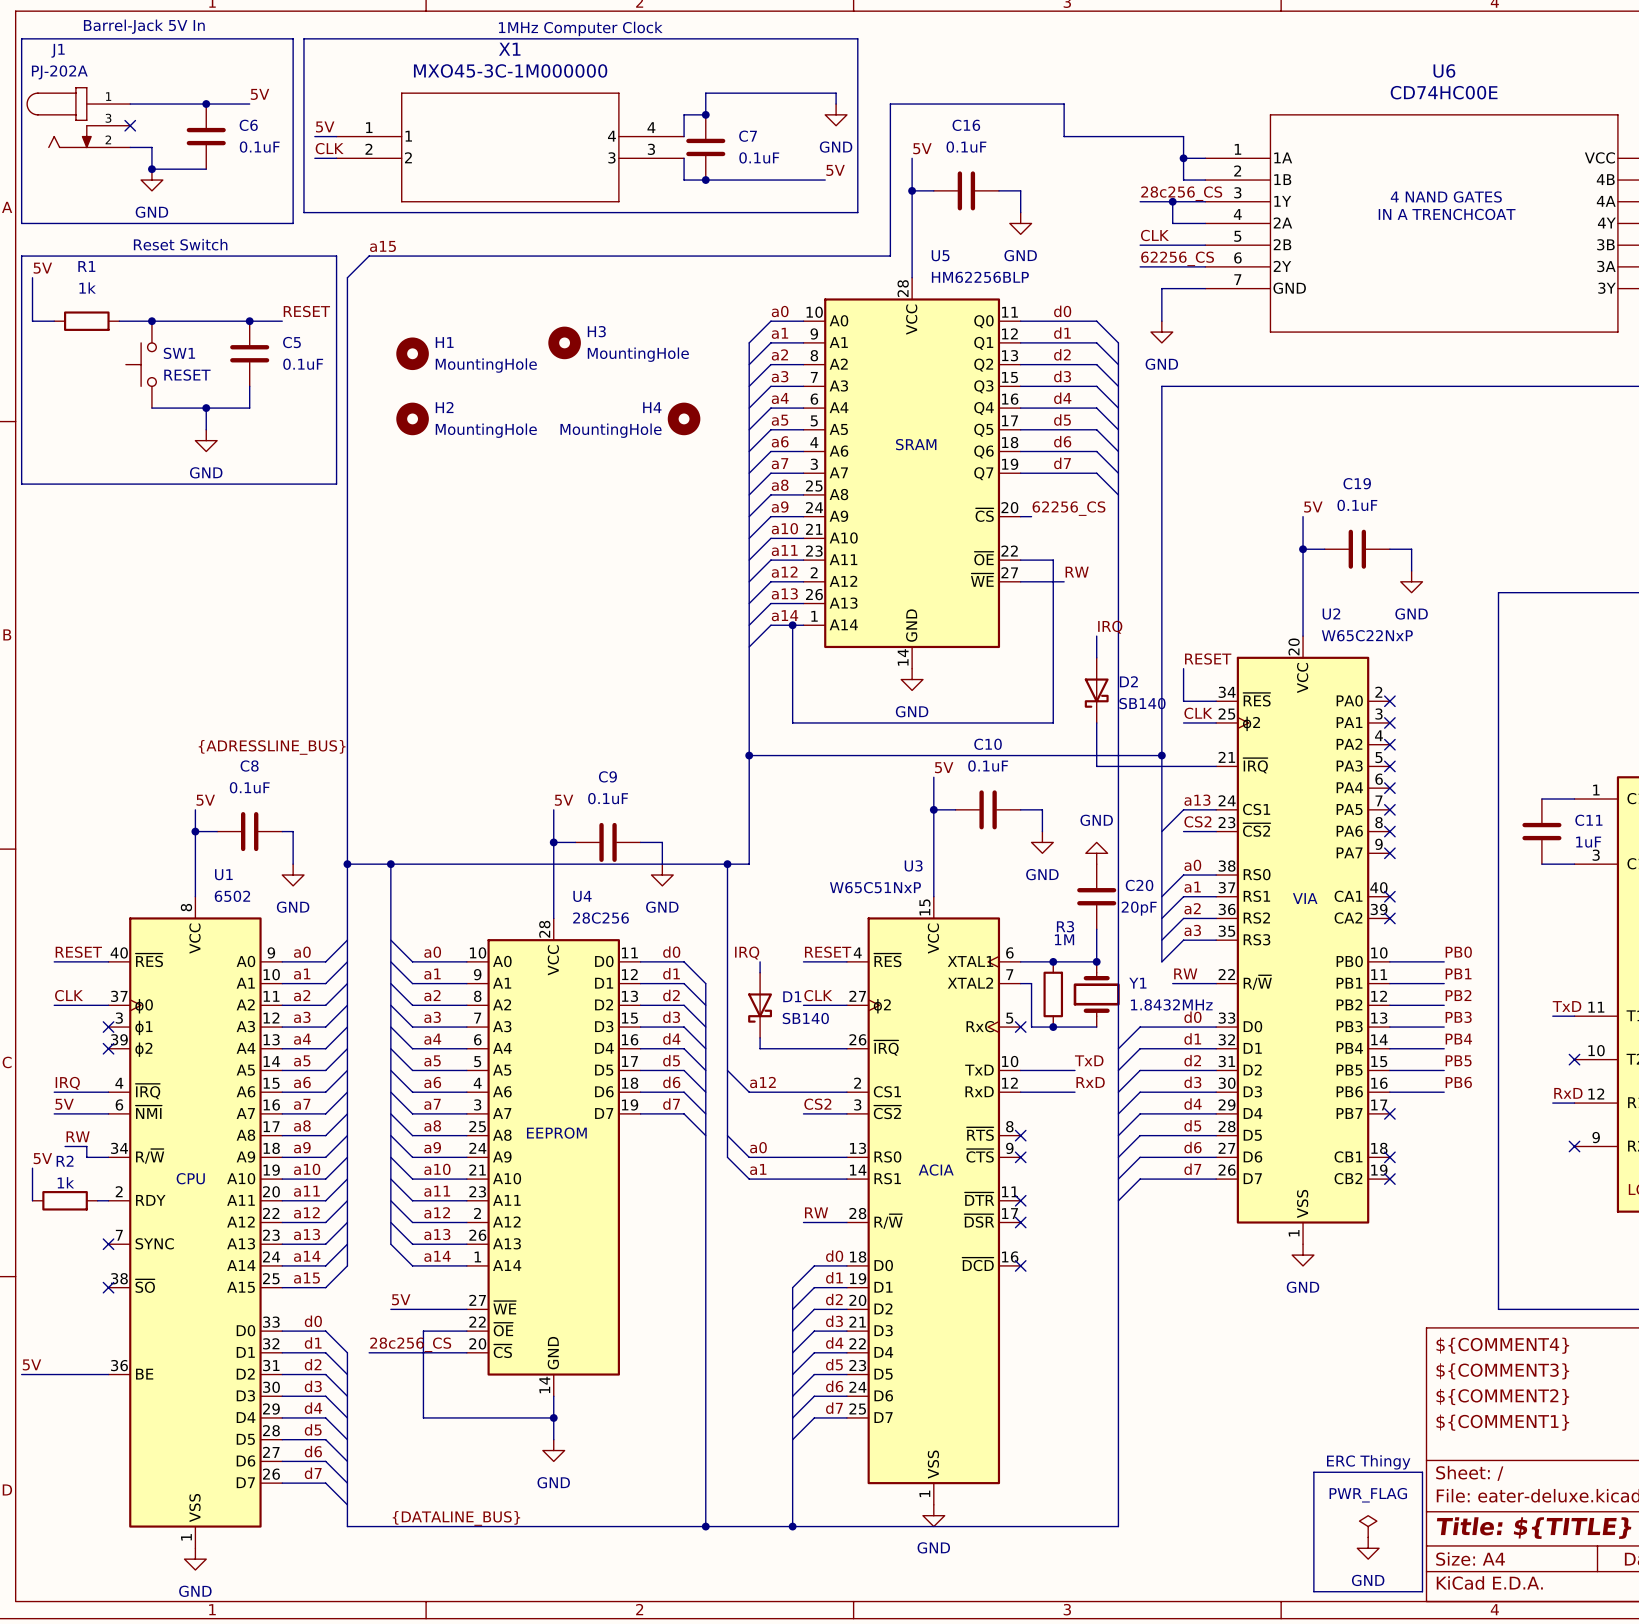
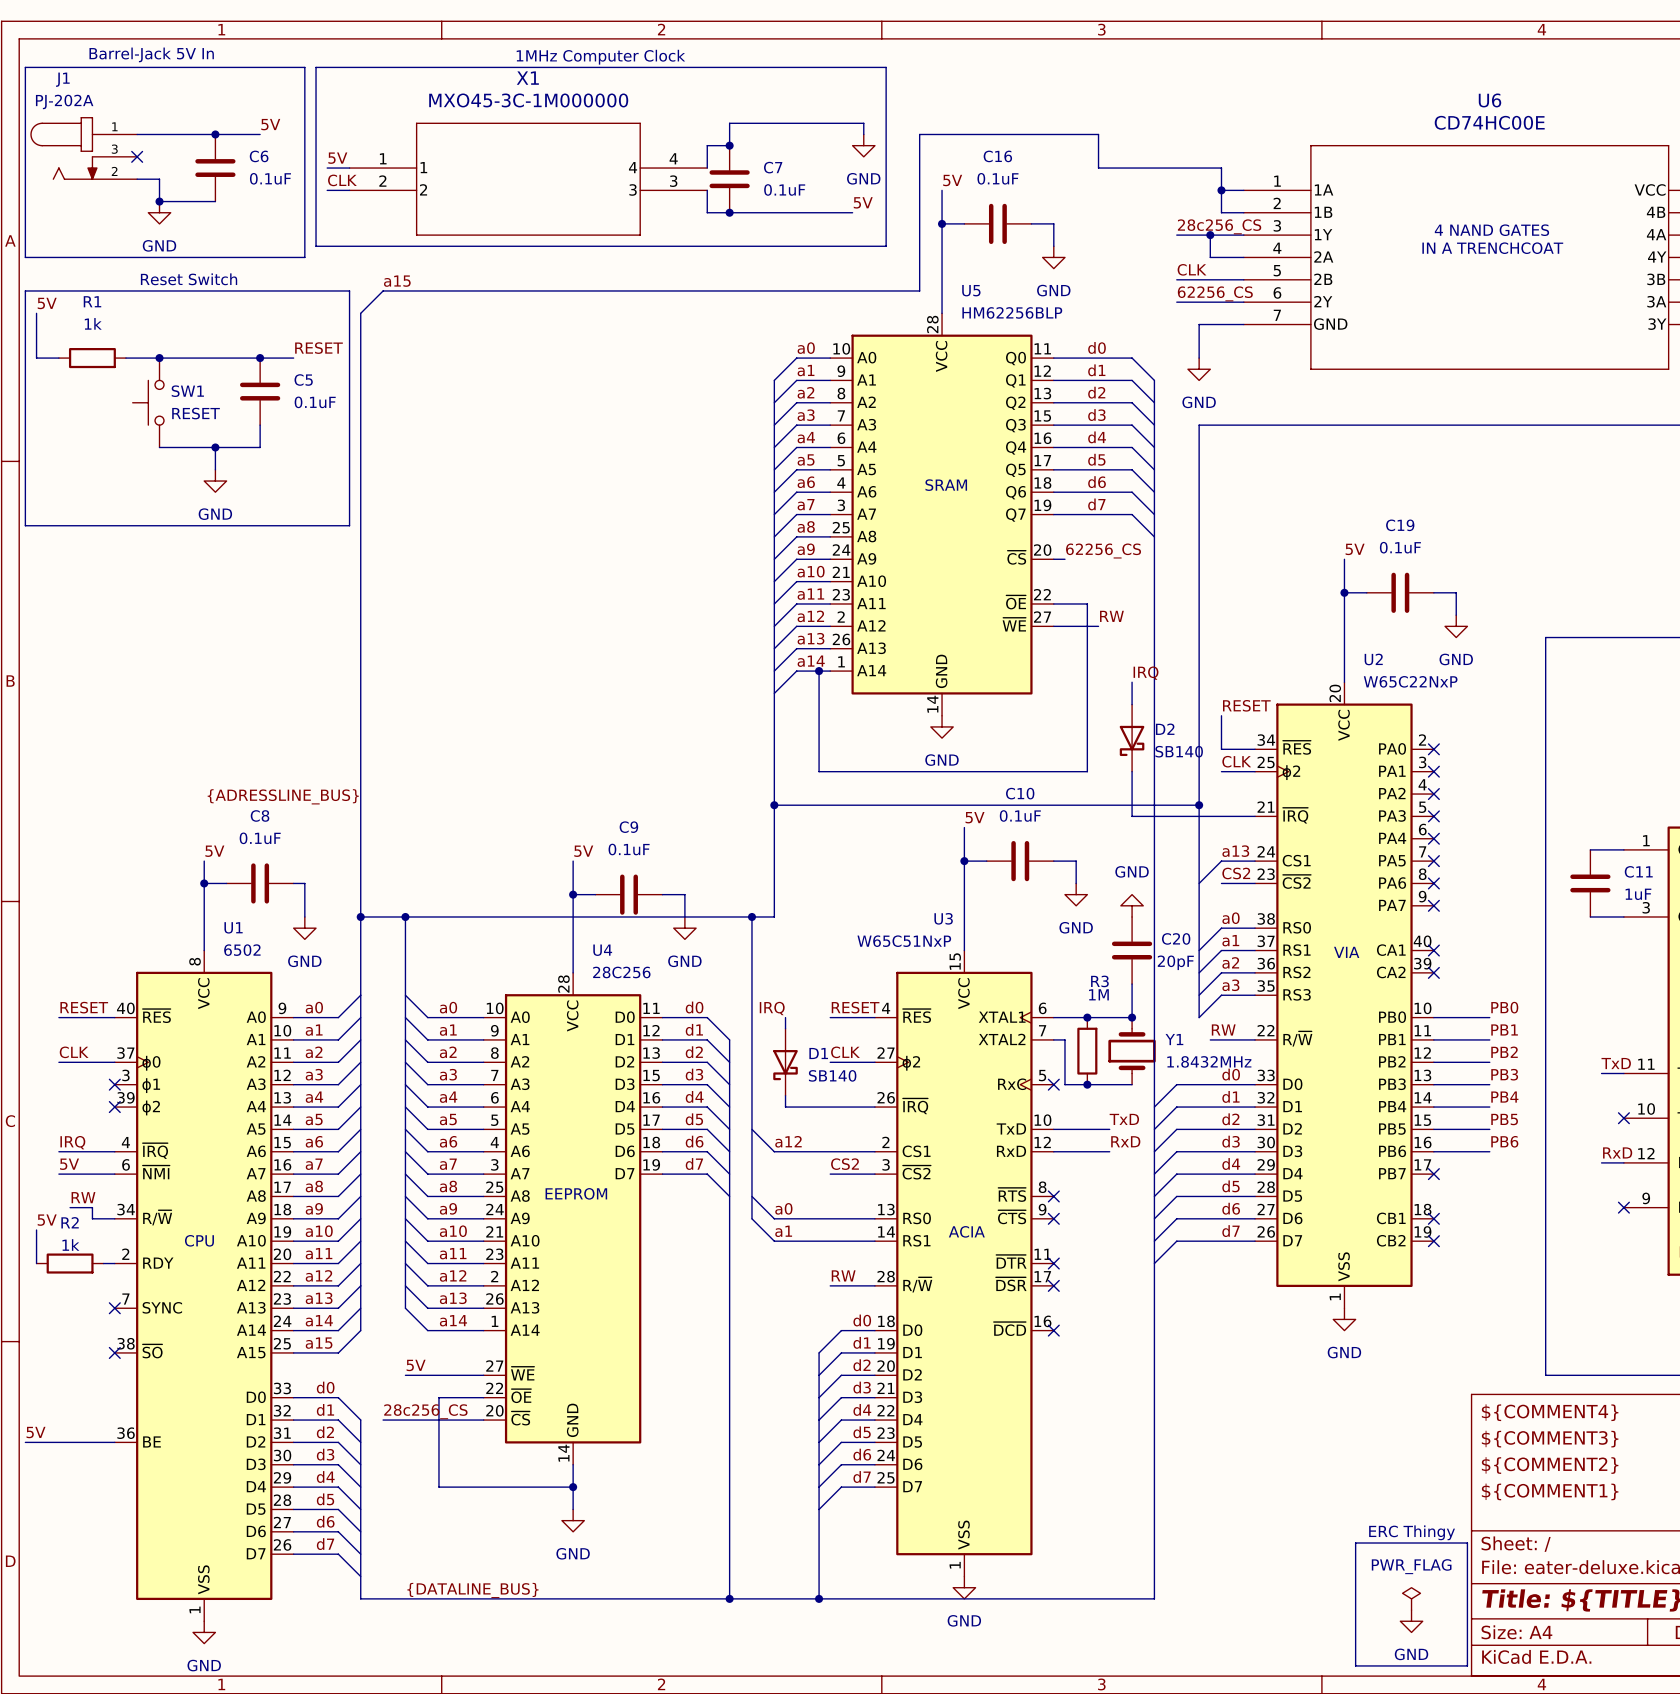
H3: MountingHole (564, 342) -> none
H1: MountingHole (412, 353) -> none
H2: MountingHole (412, 418) -> none
H4: MountingHole (684, 418) -> none

